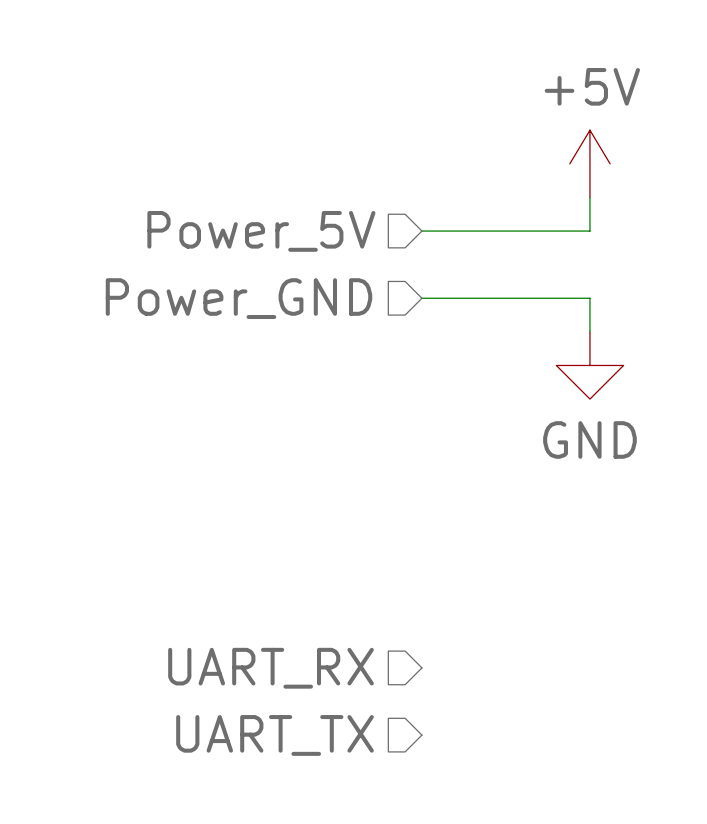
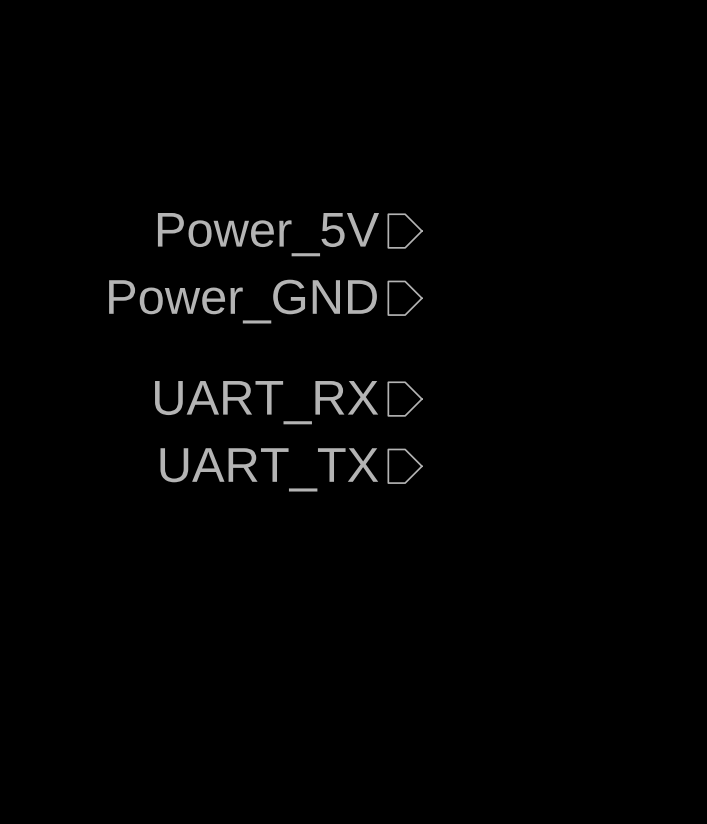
power symbol: +5V (589, 163) -> none
wire: (589, 197) (589, 231) (421, 231) -> none
wire: (421, 298) (589, 298) (589, 331) -> none
power symbol: GND (589, 365) -> none
hierarchical label position: UART_RX (271, 668) -> UART_RX (266, 402)
hierarchical label position: UART_TX (275, 735) -> UART_TX (269, 469)

